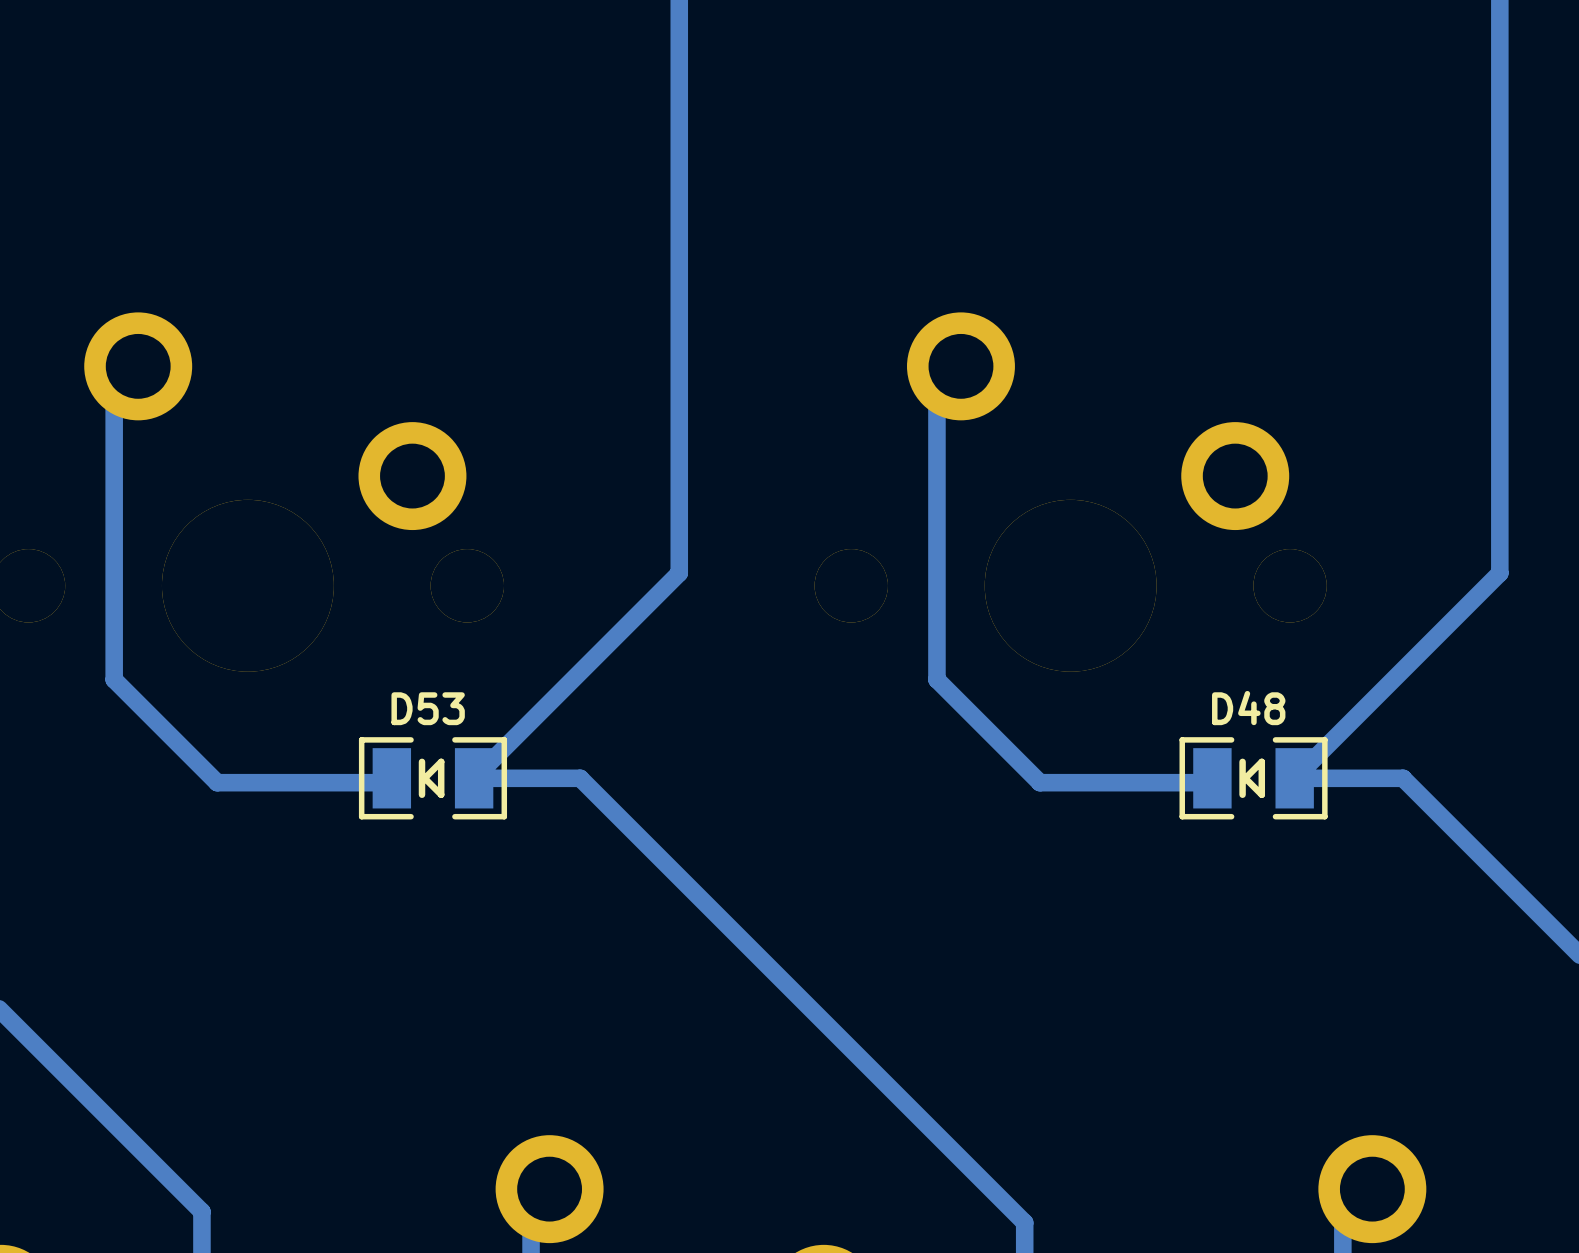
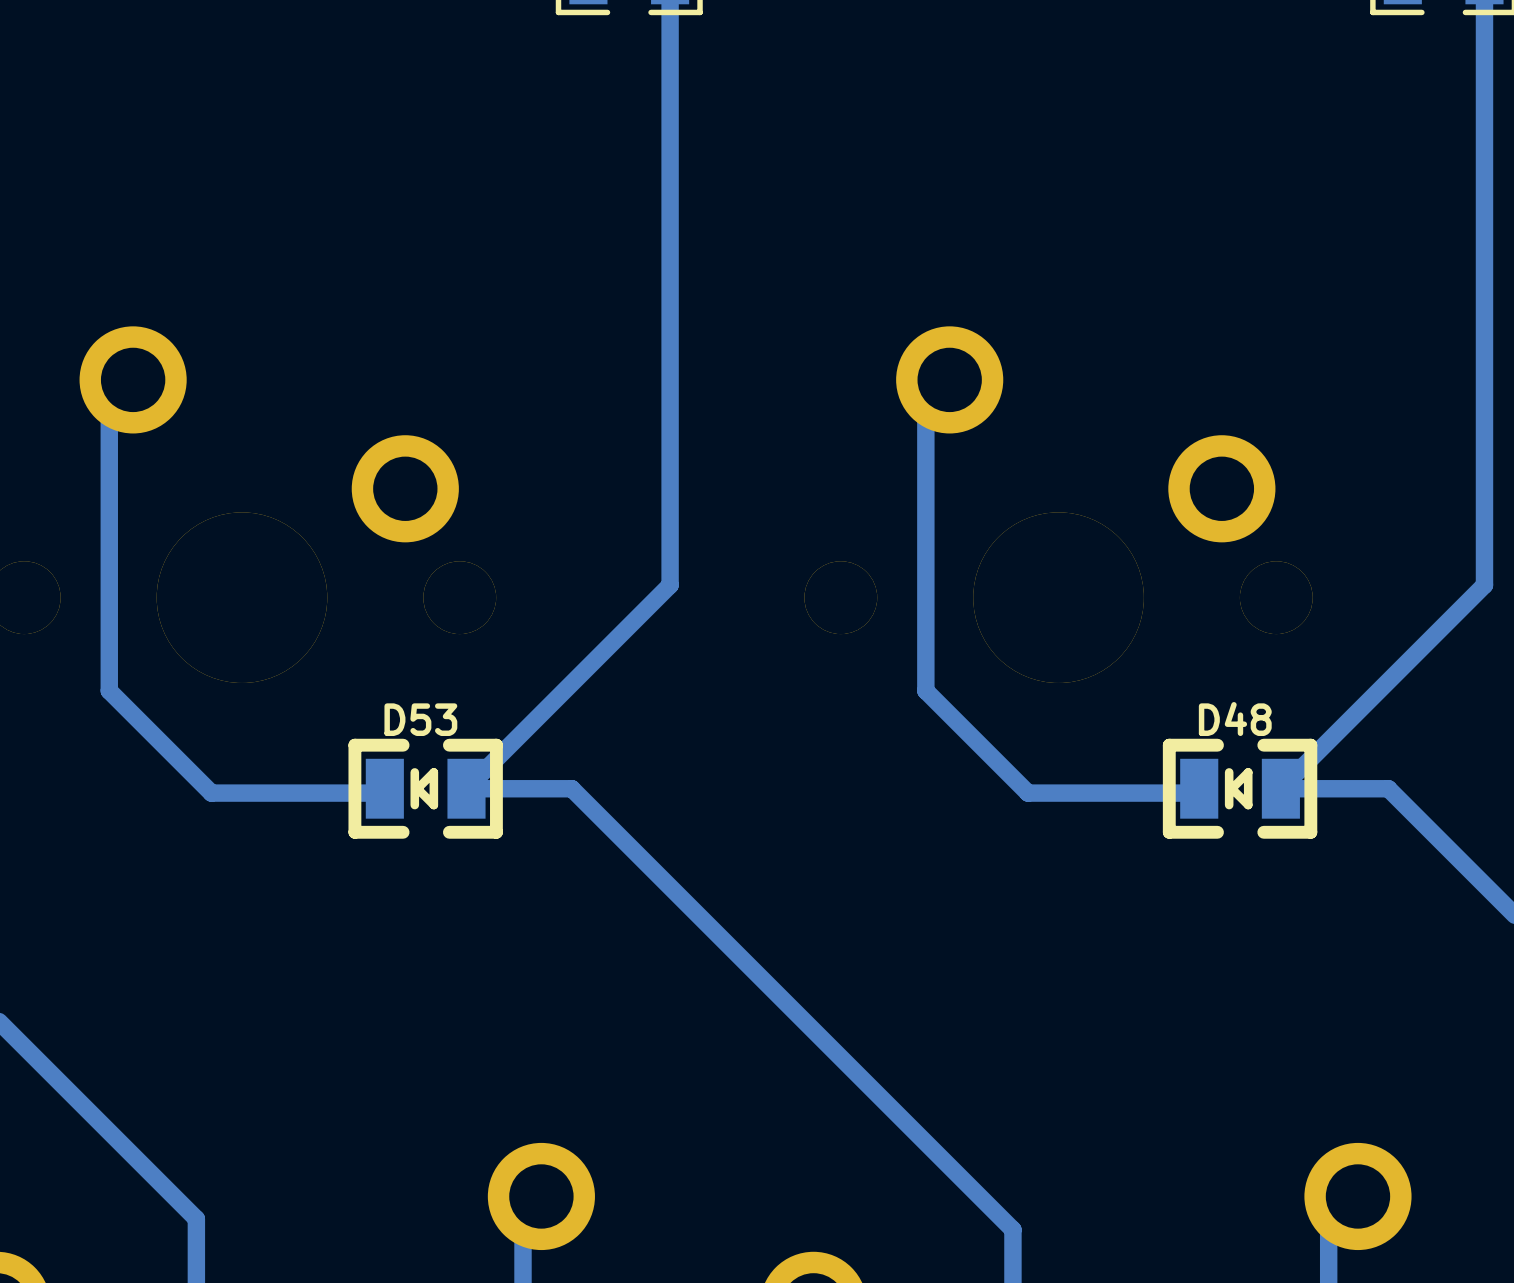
D53 footprint: [358, 737, 508, 820] -> [348, 738, 503, 839]
D48 footprint: [1179, 737, 1328, 820] -> [1162, 738, 1318, 839]

